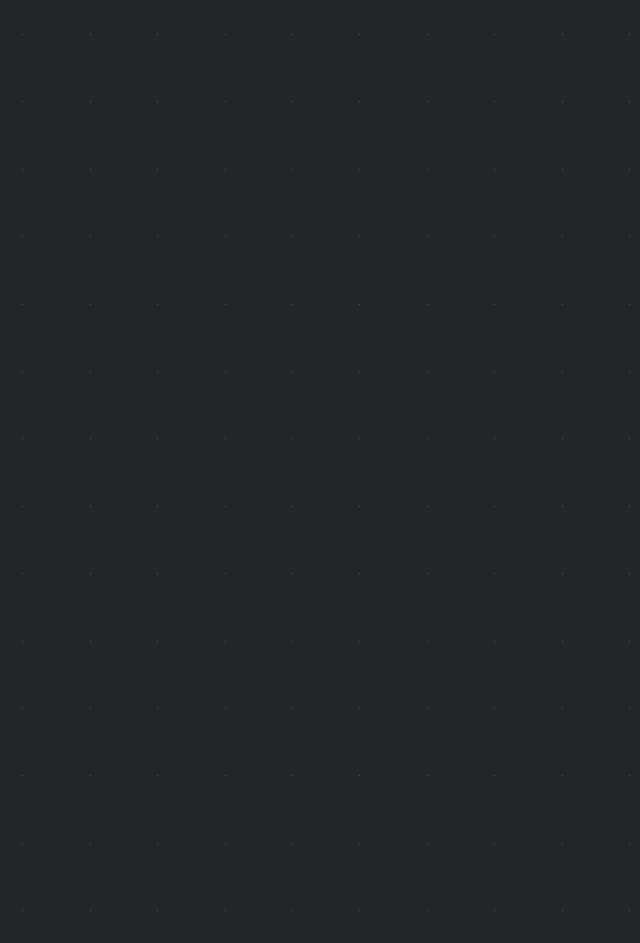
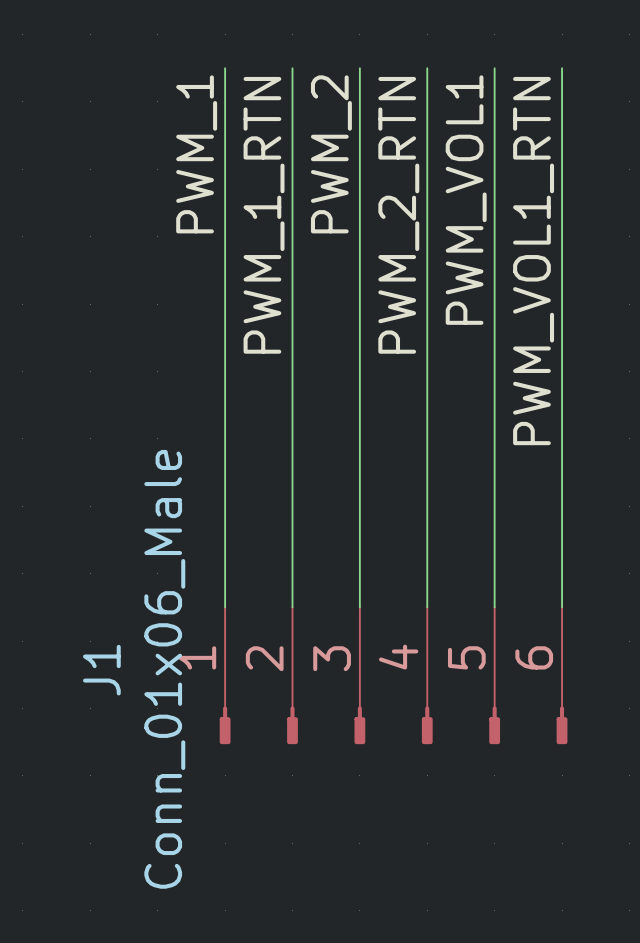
wire: none -> (225, 68) (225, 607)
wire: none -> (292, 68) (292, 607)
wire: none -> (359, 68) (359, 607)
wire: none -> (427, 68) (427, 607)
wire: none -> (494, 68) (494, 607)
wire: none -> (562, 68) (562, 607)
label: none -> PWM_1 (196, 154)
label: none -> PWM_2 (331, 154)
label: none -> PWM_VOL1 (466, 200)
label: none -> PWM_1_RTN (264, 215)
label: none -> PWM_2_RTN (398, 215)
label: none -> PWM_VOL1_RTN (533, 261)
J1: none -> Conn_01x06_Male (393, 675)

